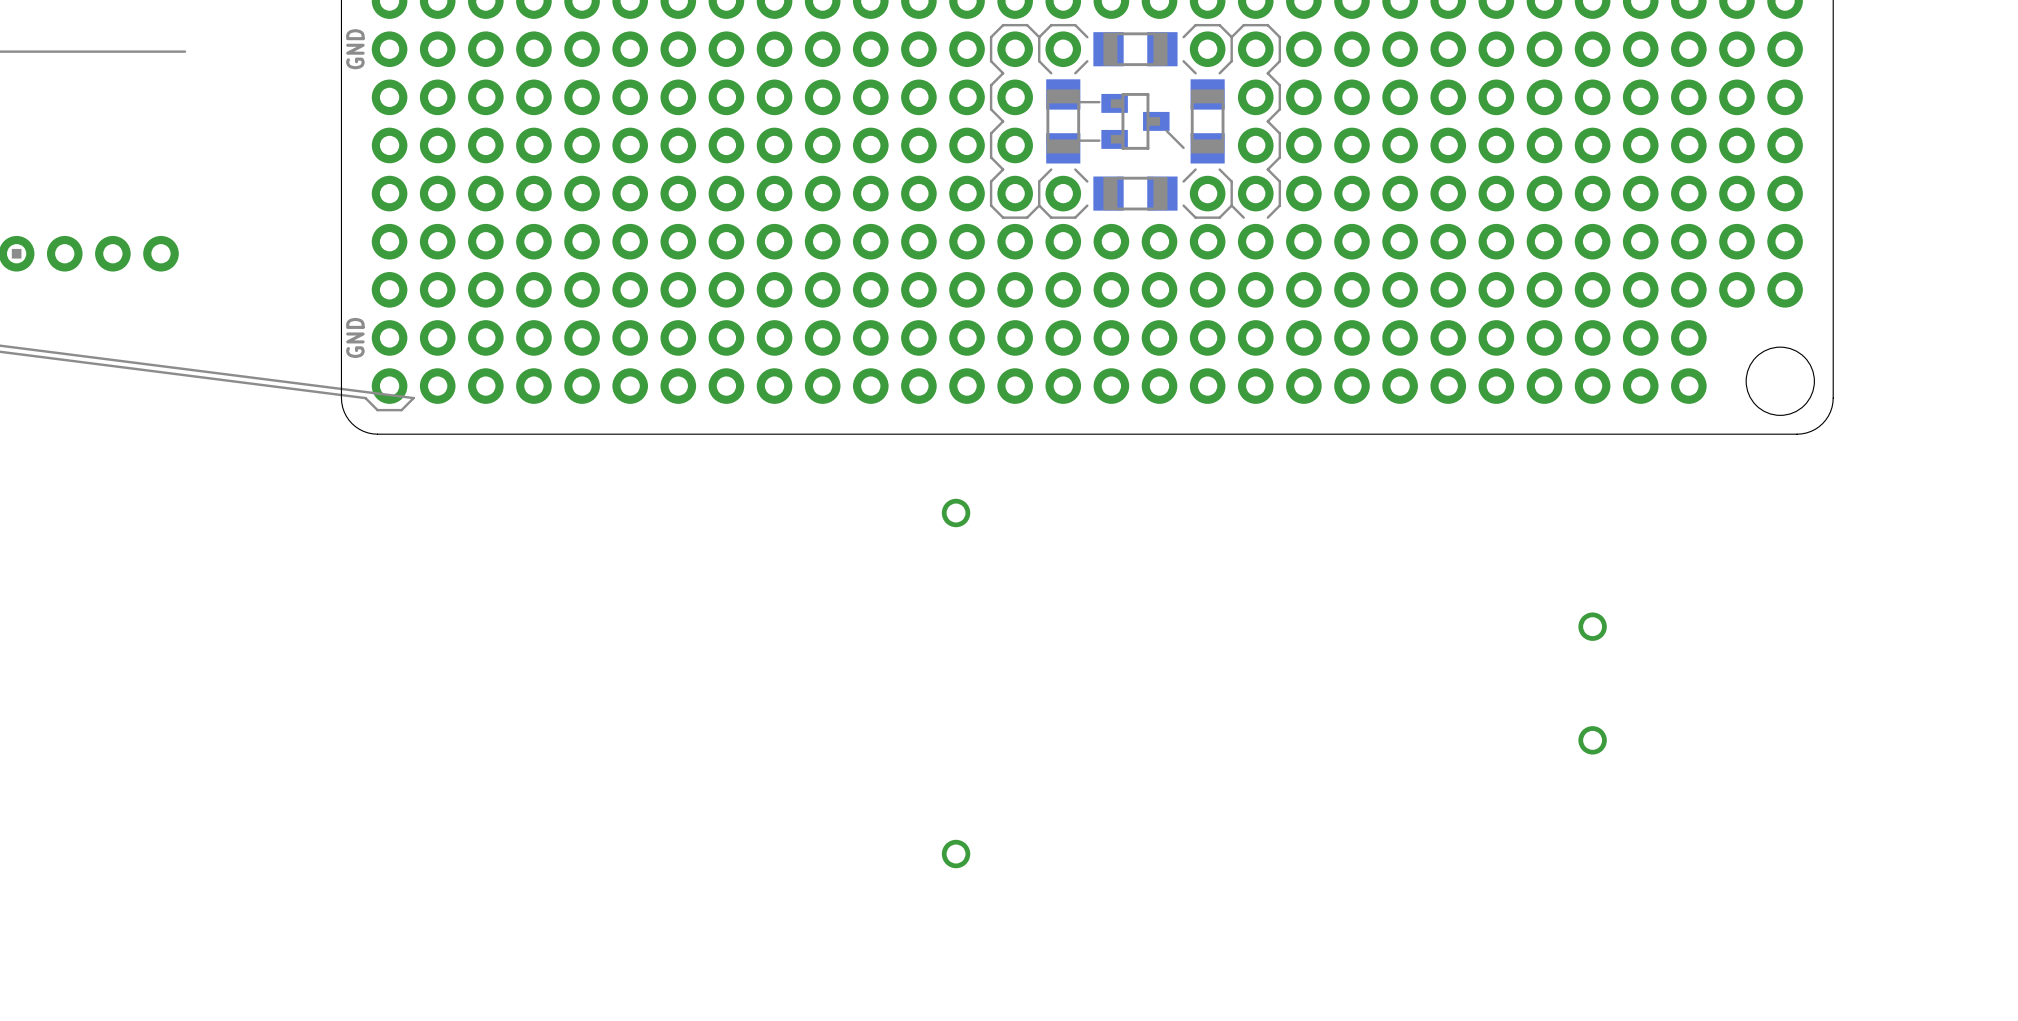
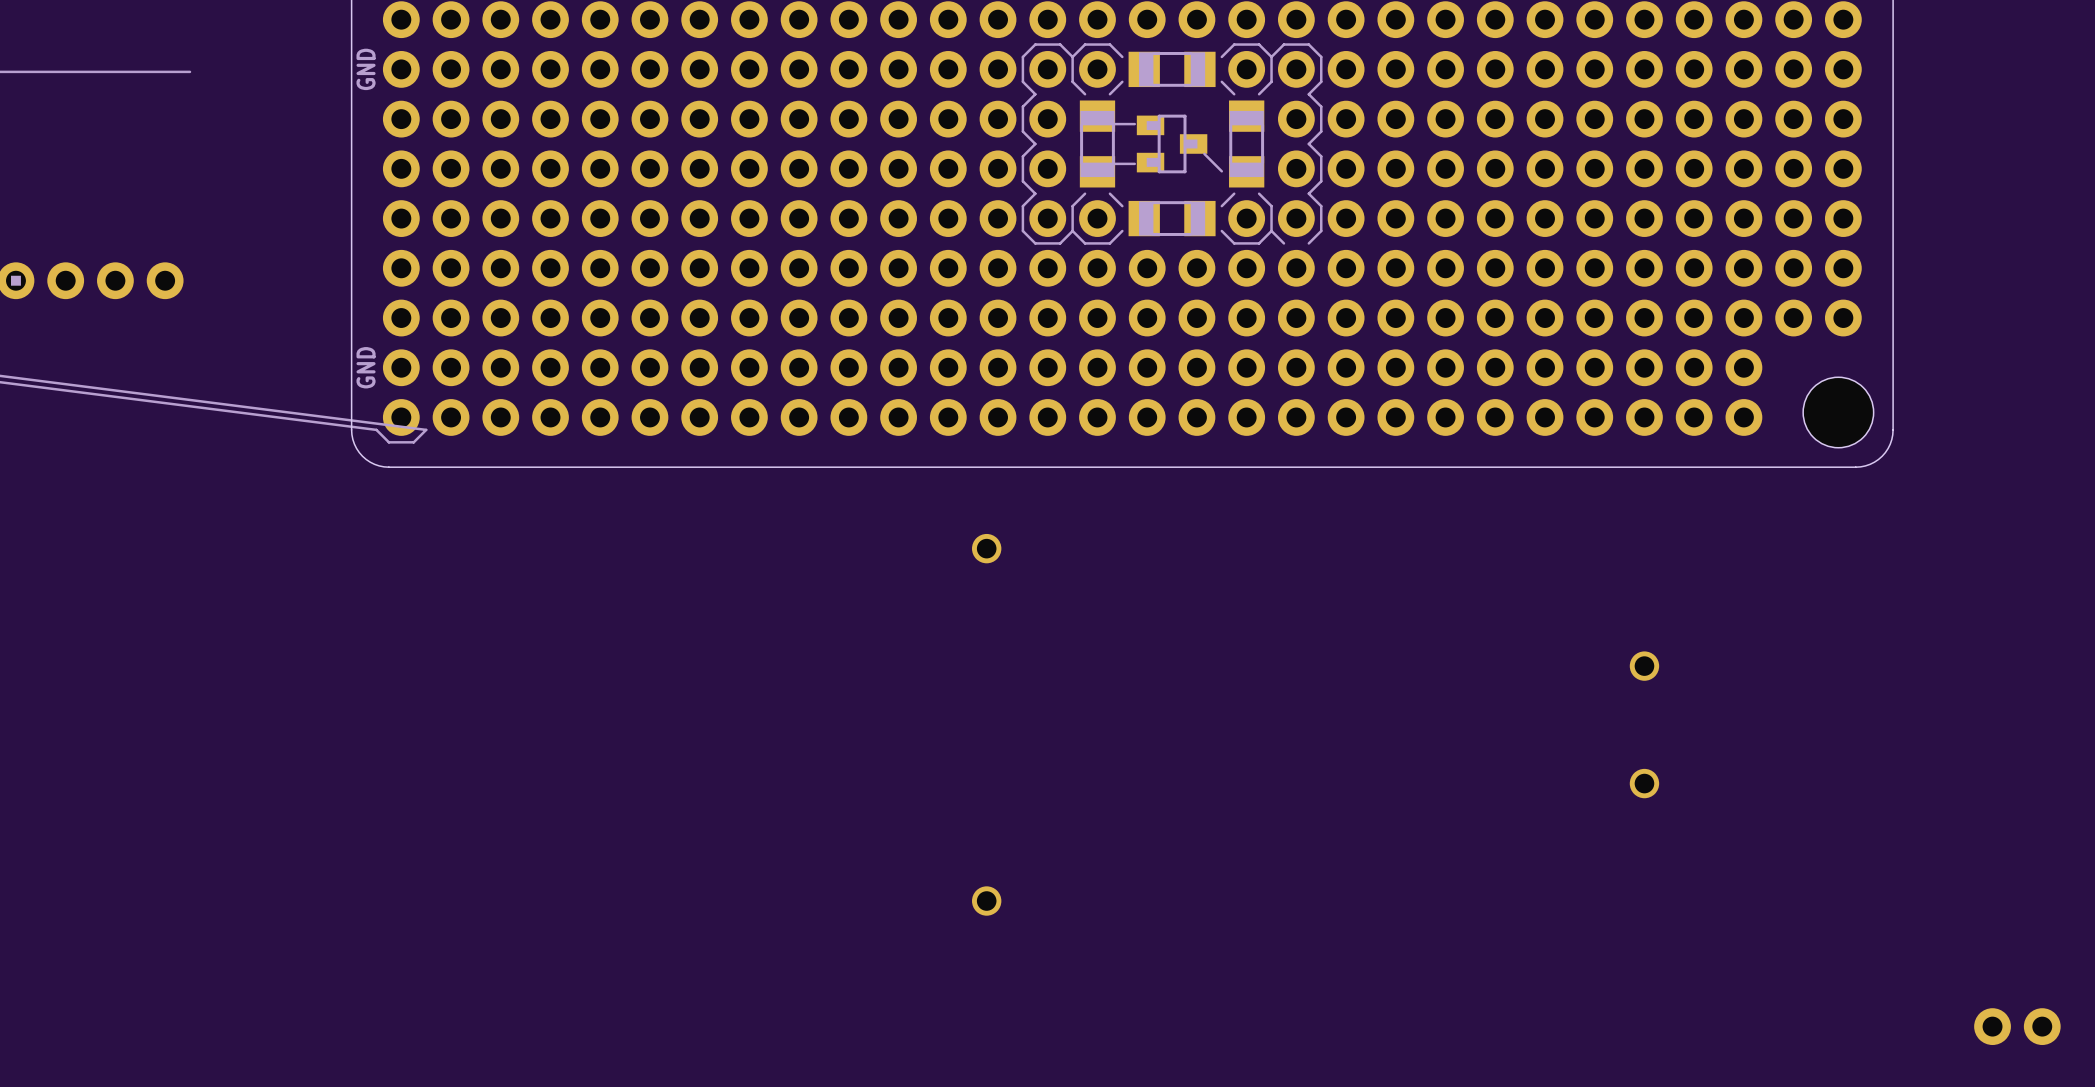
part: none -> (2017, 1026)

